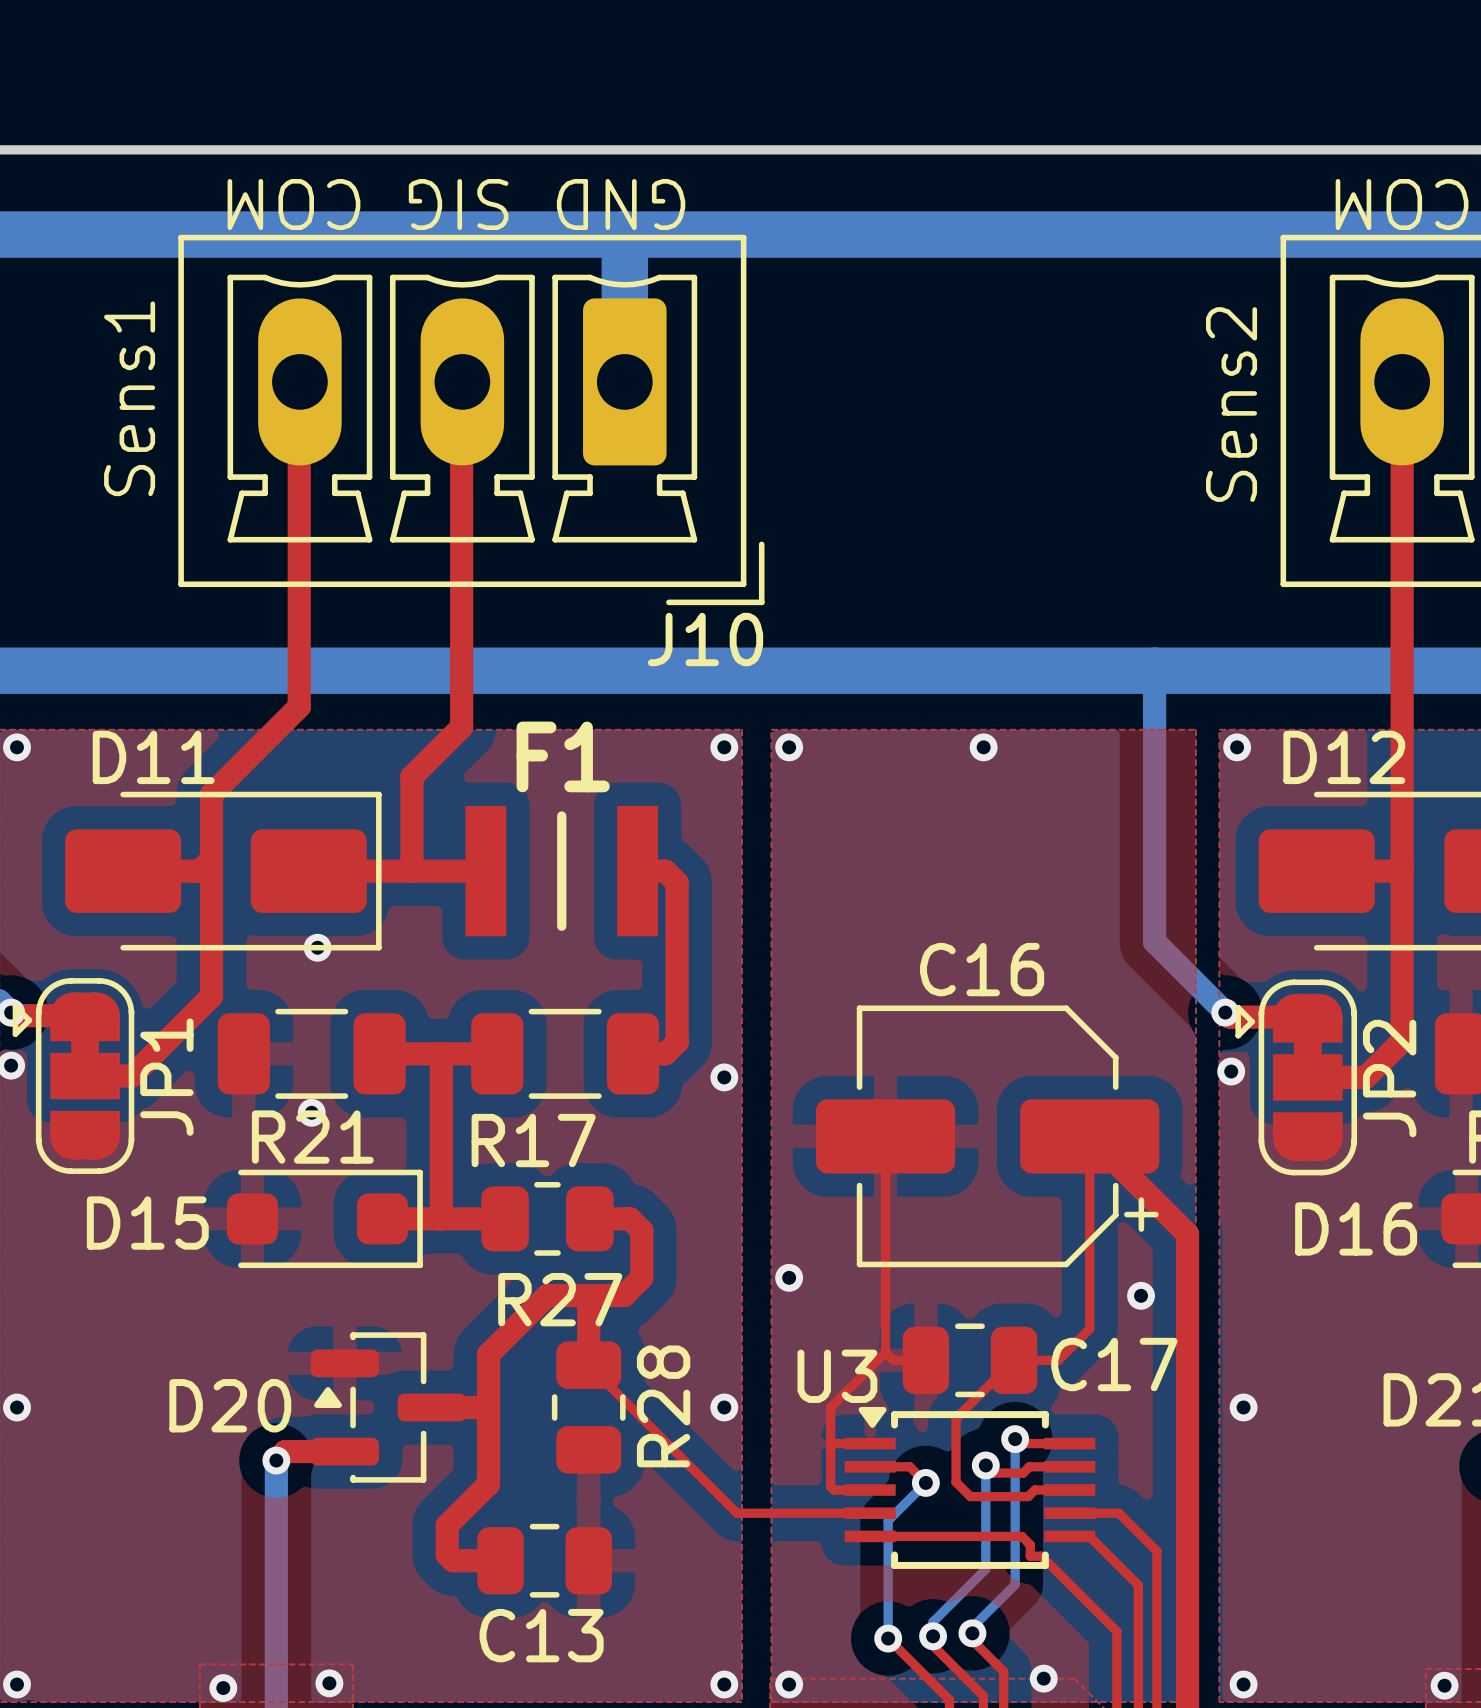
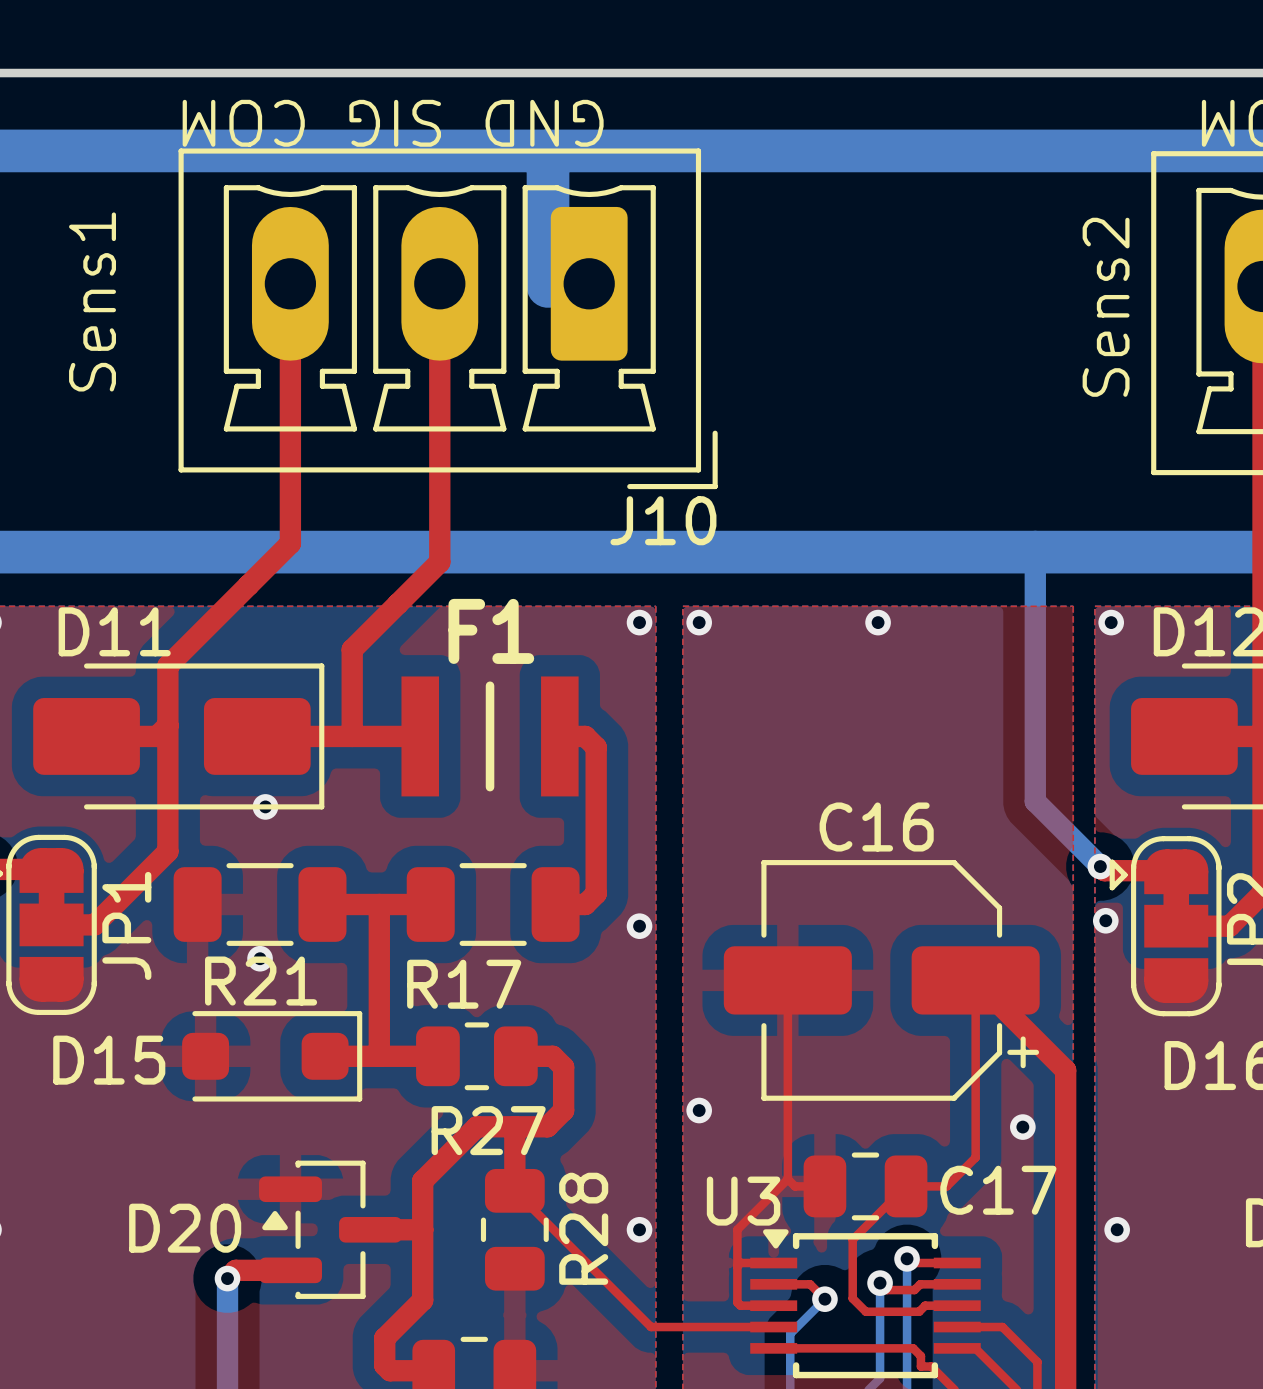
J10 footprint: [178, 234, 765, 606] -> [178, 148, 718, 490]
top track: (299, 381) (299, 706) -> (290, 283) (290, 543) (248, 585)
top track: (461, 381) (461, 727) -> (439, 283) (439, 562) (397, 603)
J10 name position: J10 (705, 639) -> J10 (663, 520)

